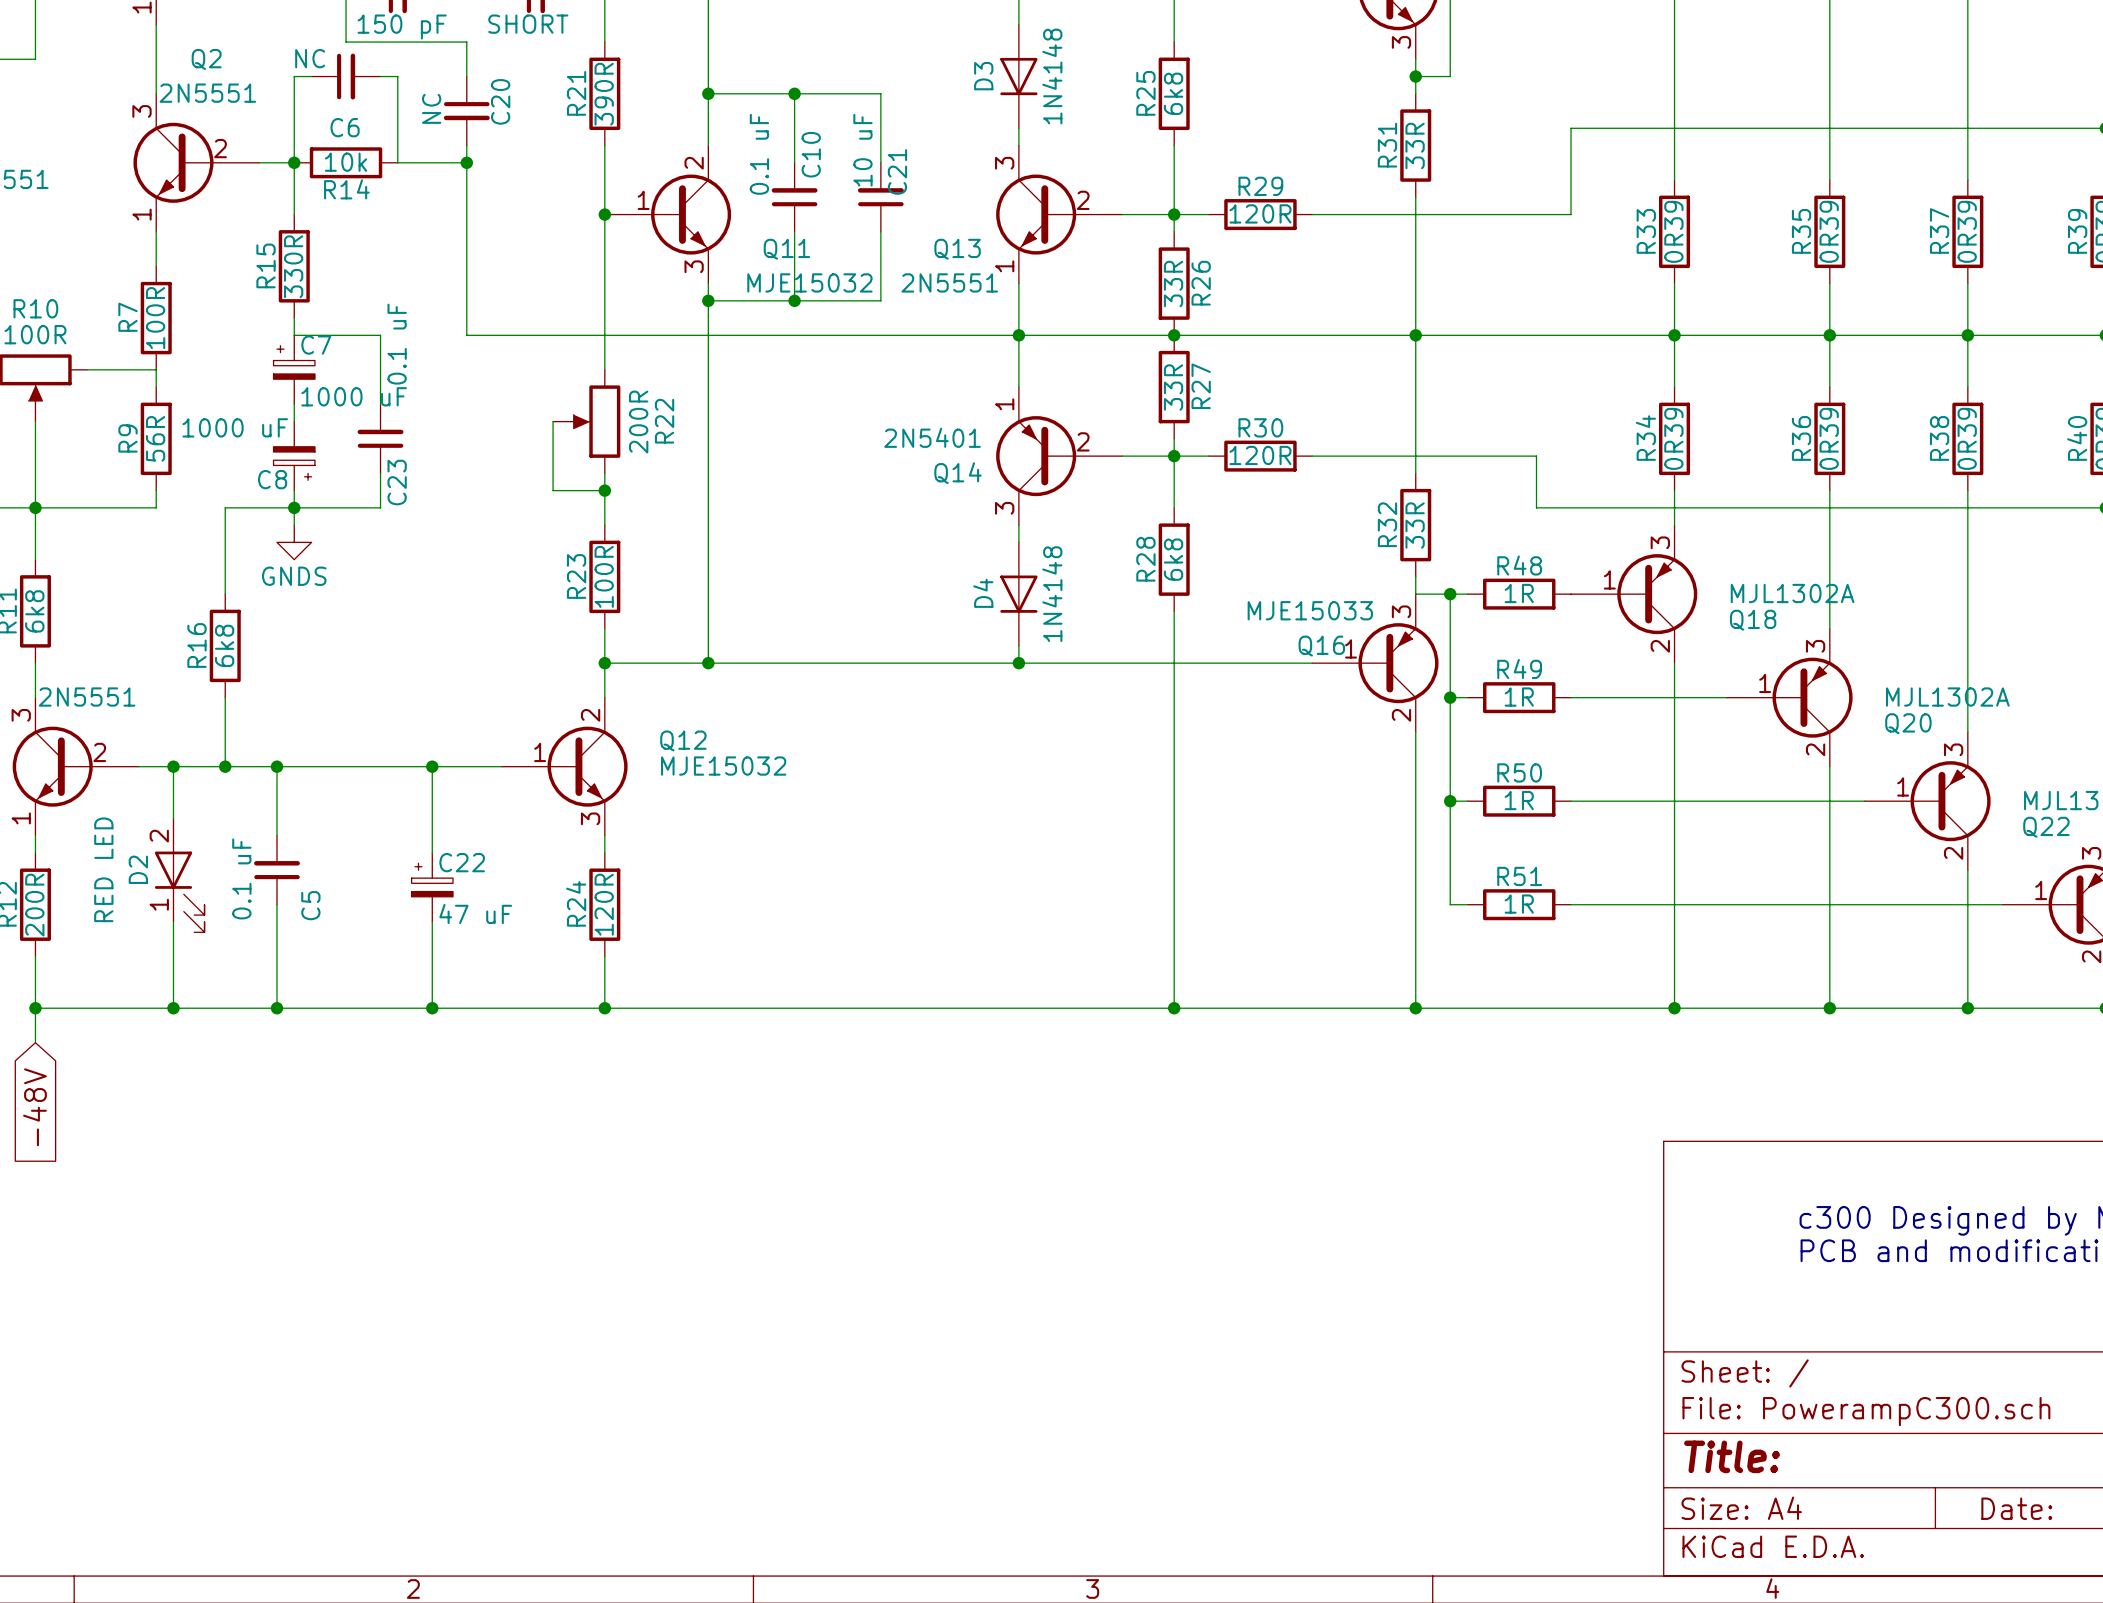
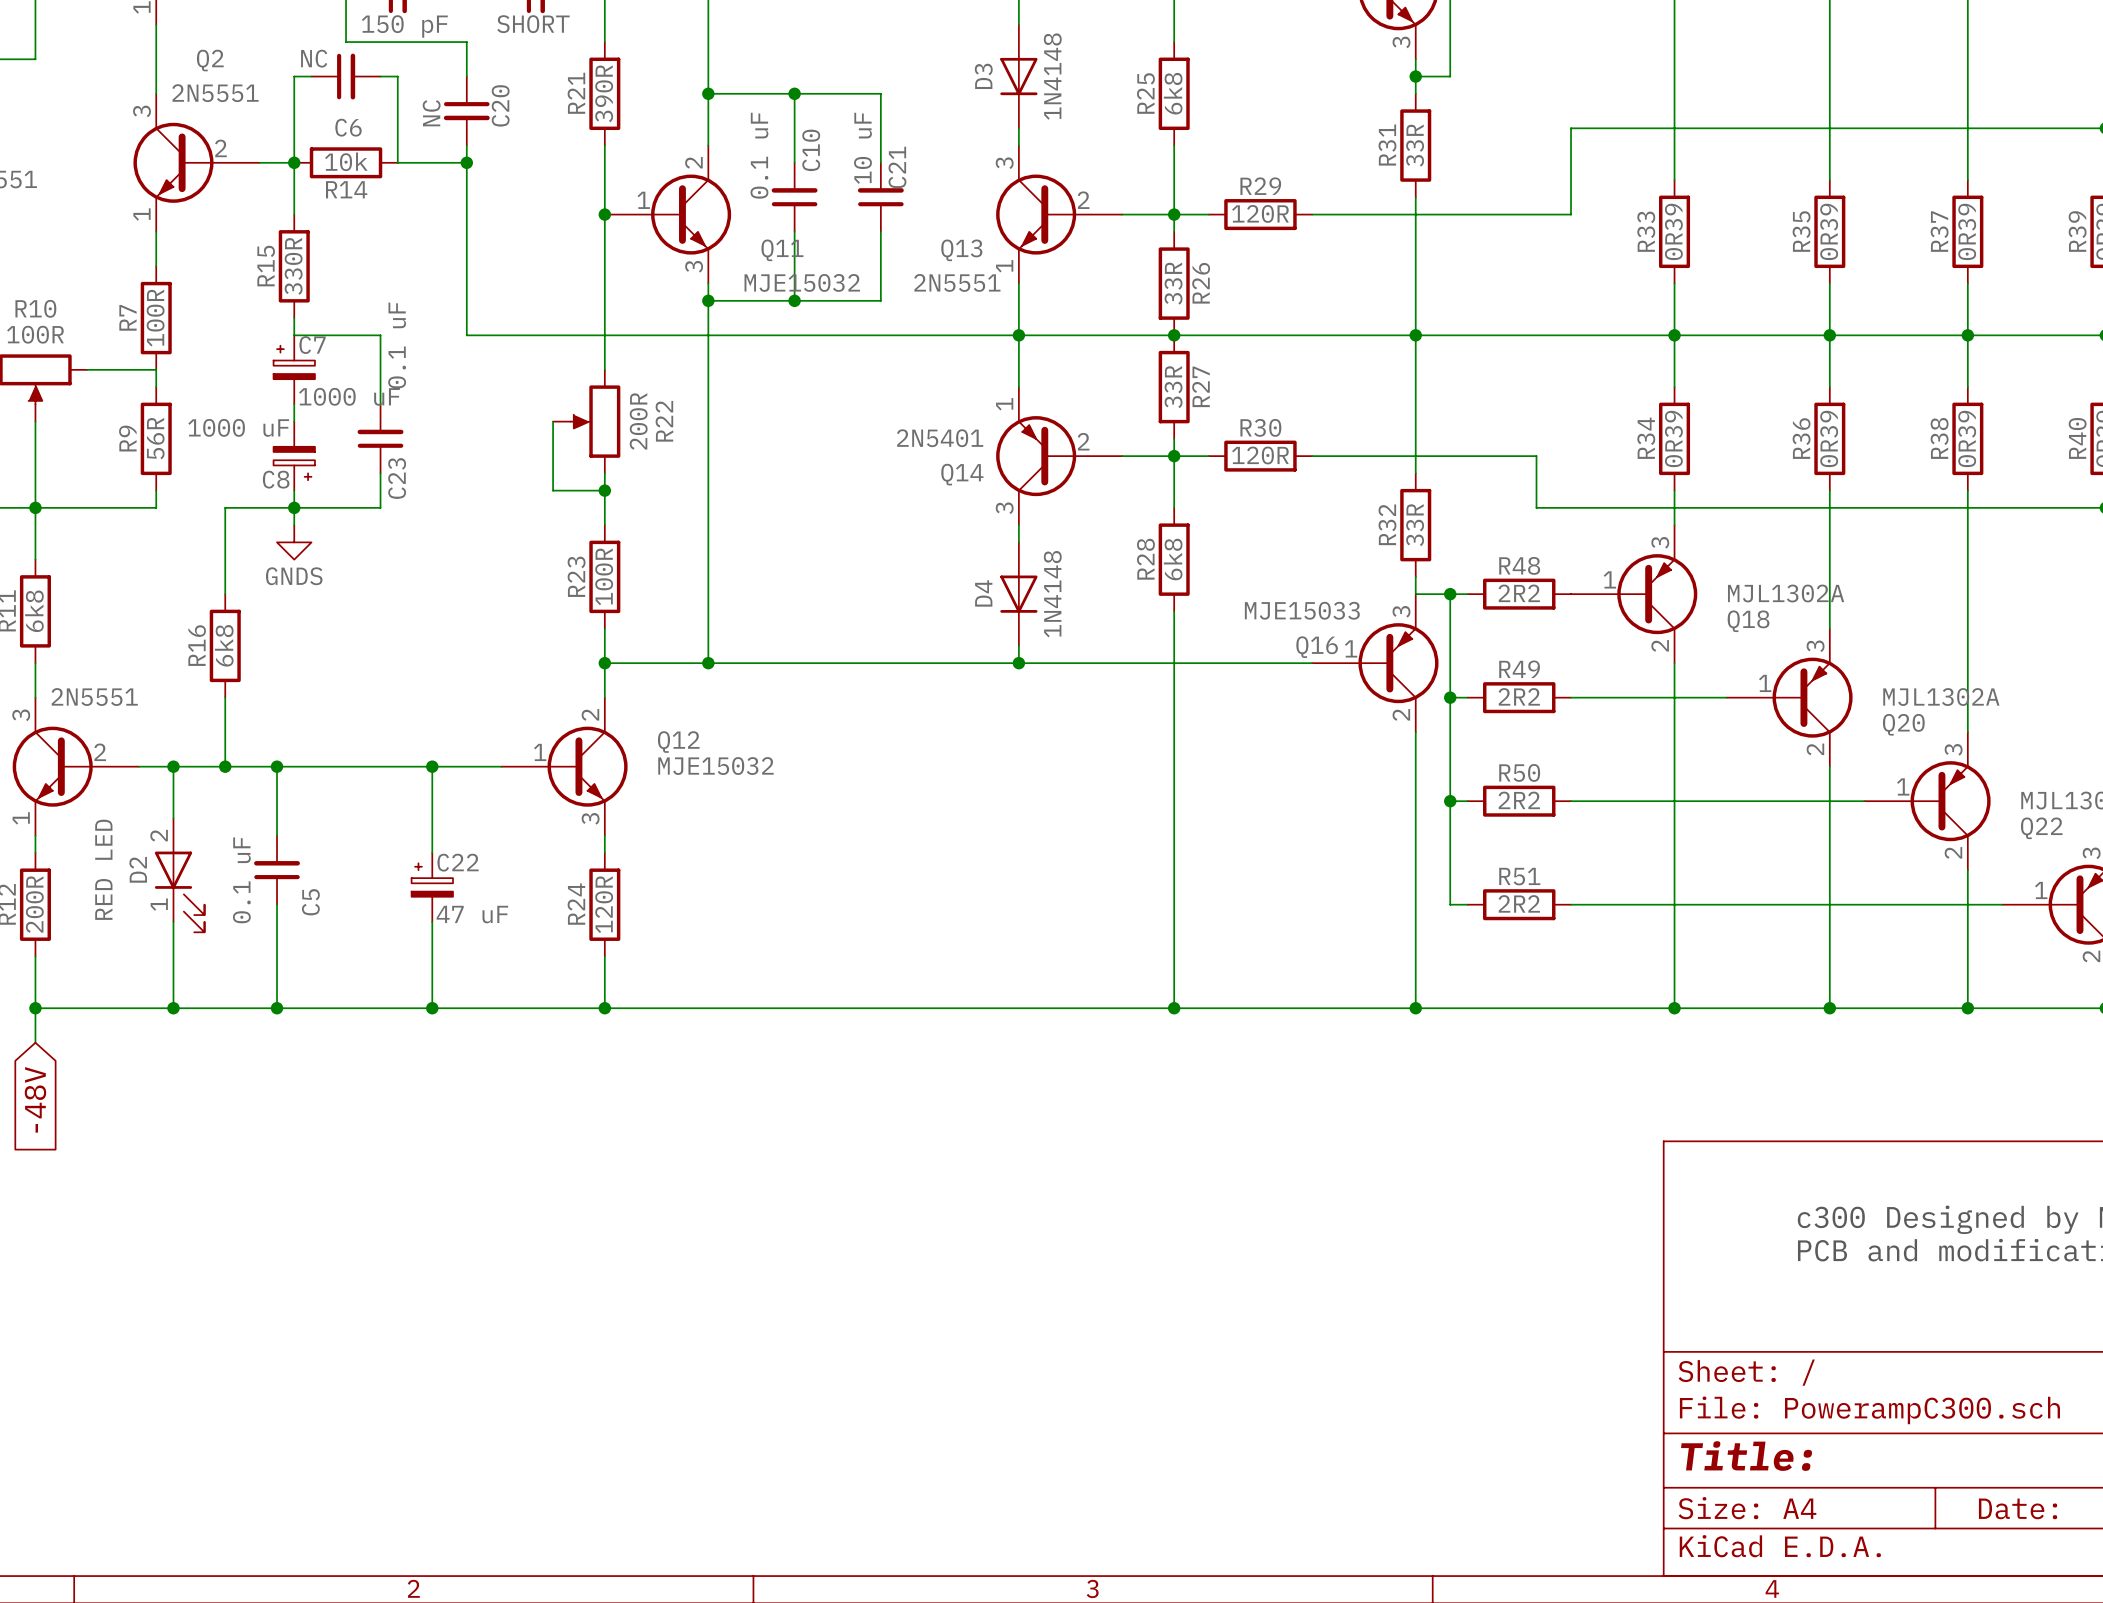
R48 value: 1R (1519, 593) -> 2R2 (1519, 593)
R49 value: 1R (1519, 697) -> 2R2 (1519, 696)
R50 value: 1R (1519, 800) -> 2R2 (1519, 800)
R51 value: 1R (1519, 904) -> 2R2 (1519, 903)

